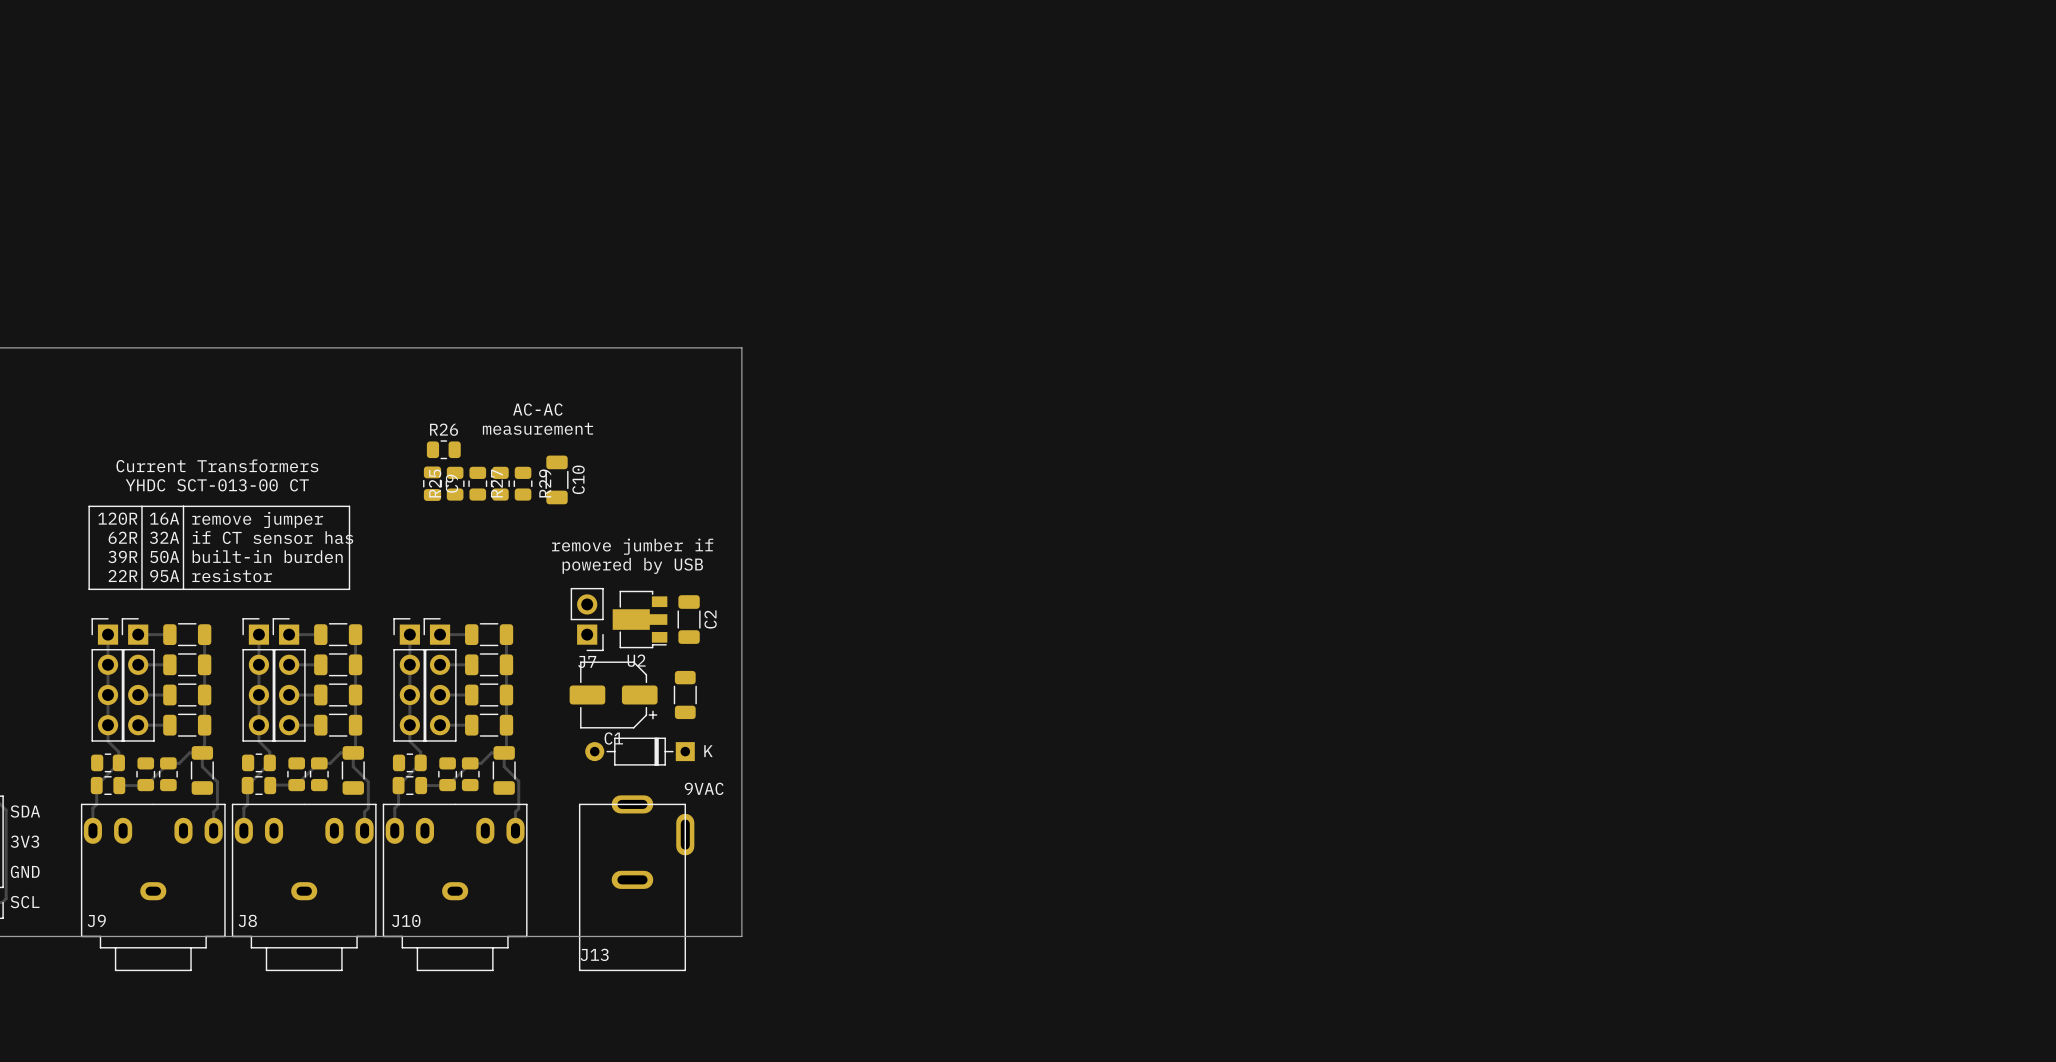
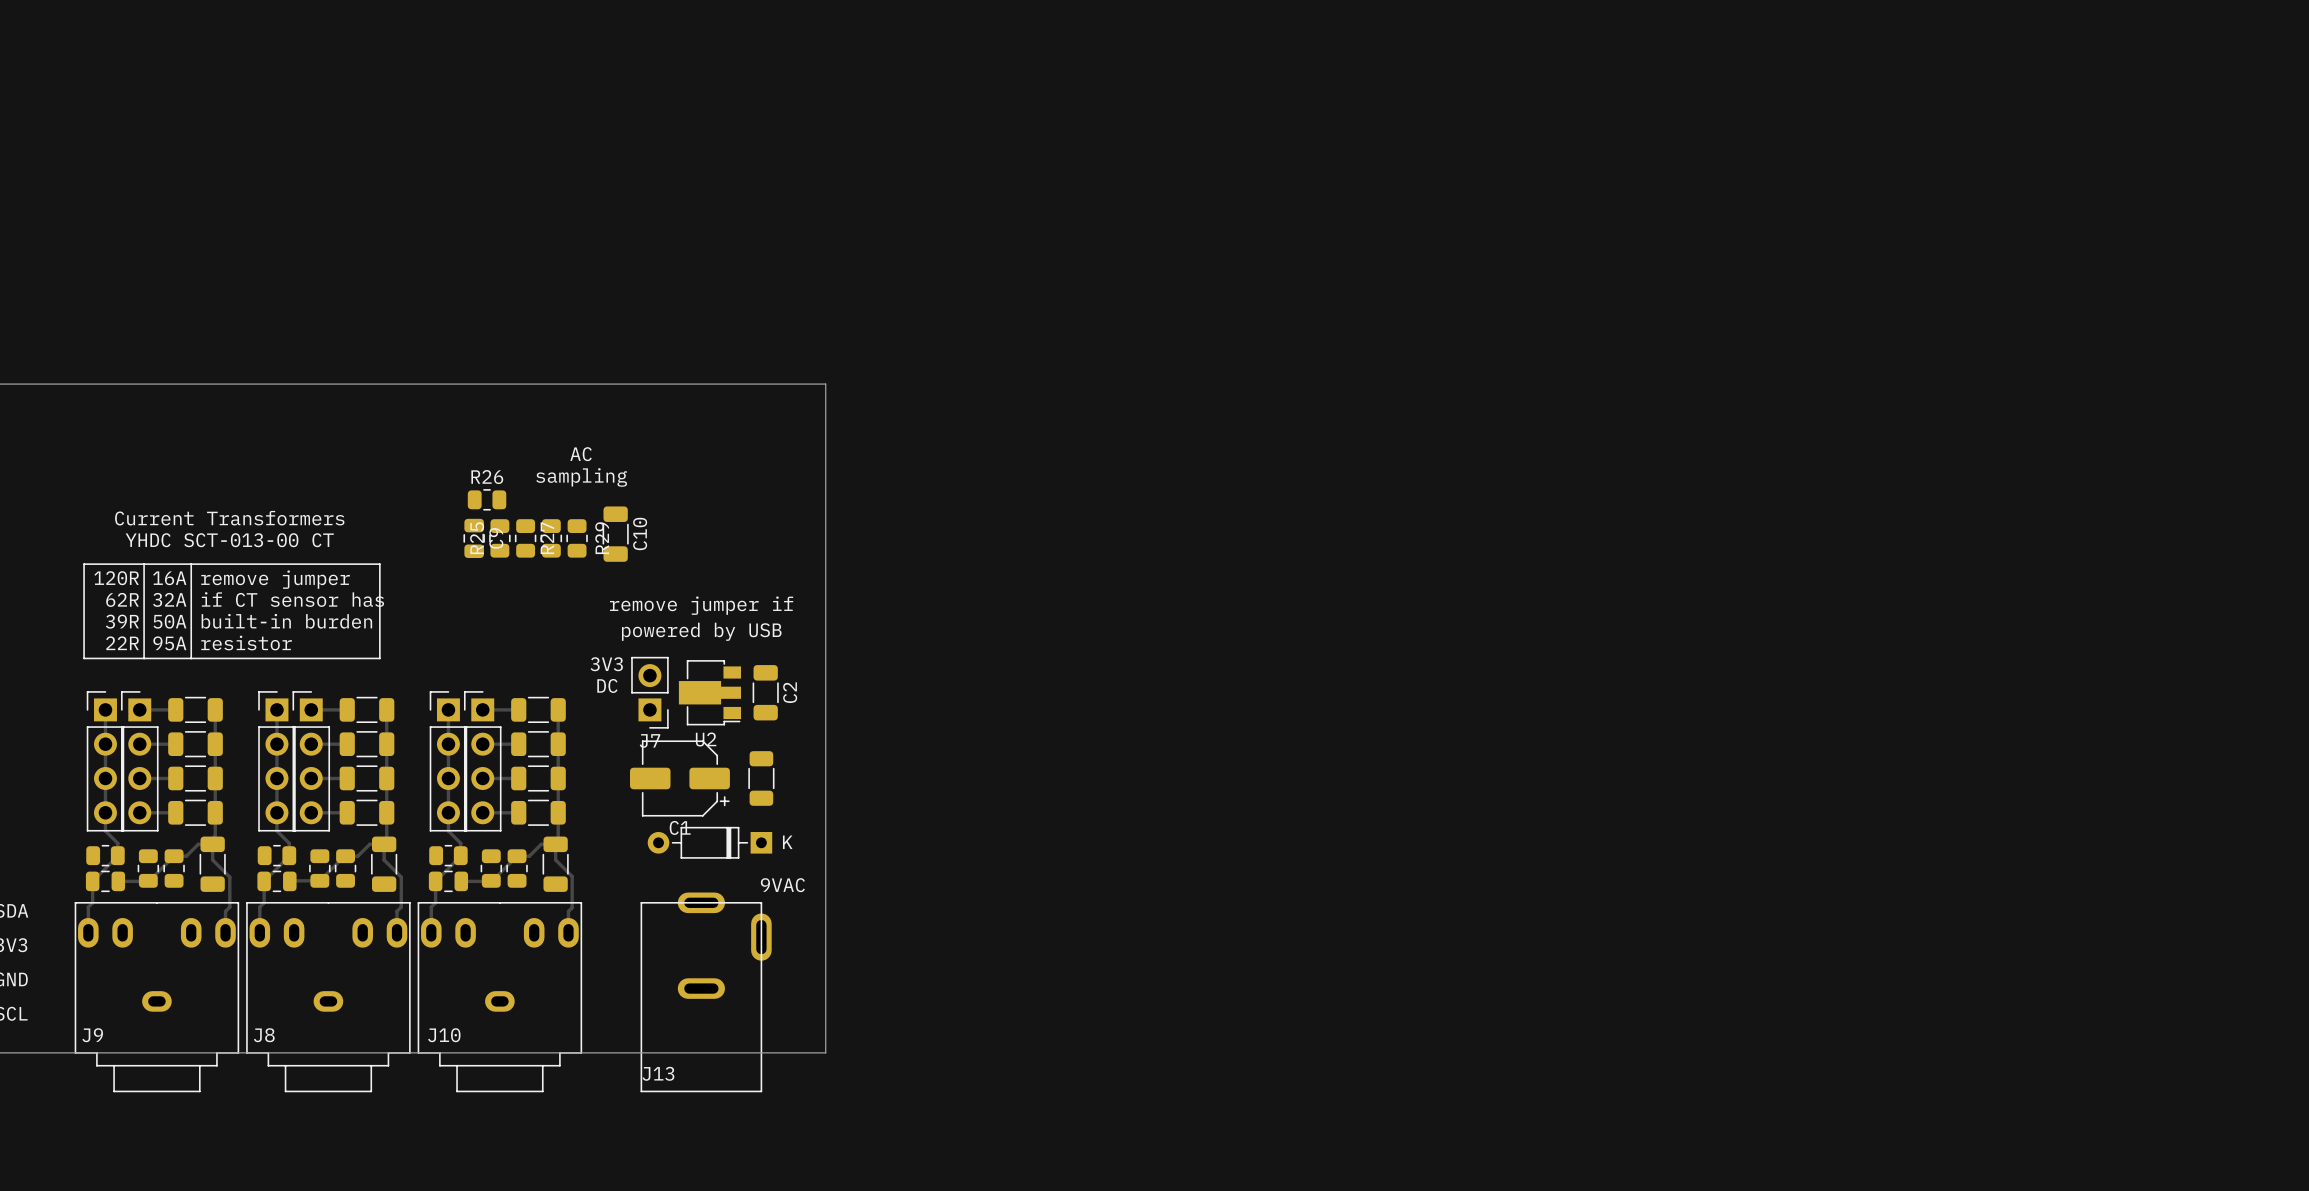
text: none -> AC (581, 454)
text: AC-AC (537, 409) -> none
text: measurement (537, 428) -> none
text: none -> sampling (581, 477)
text: remove jumber if (632, 546) -> remove jumper if (701, 605)
text: none -> 3V3 (606, 664)
text: none -> DC (607, 685)

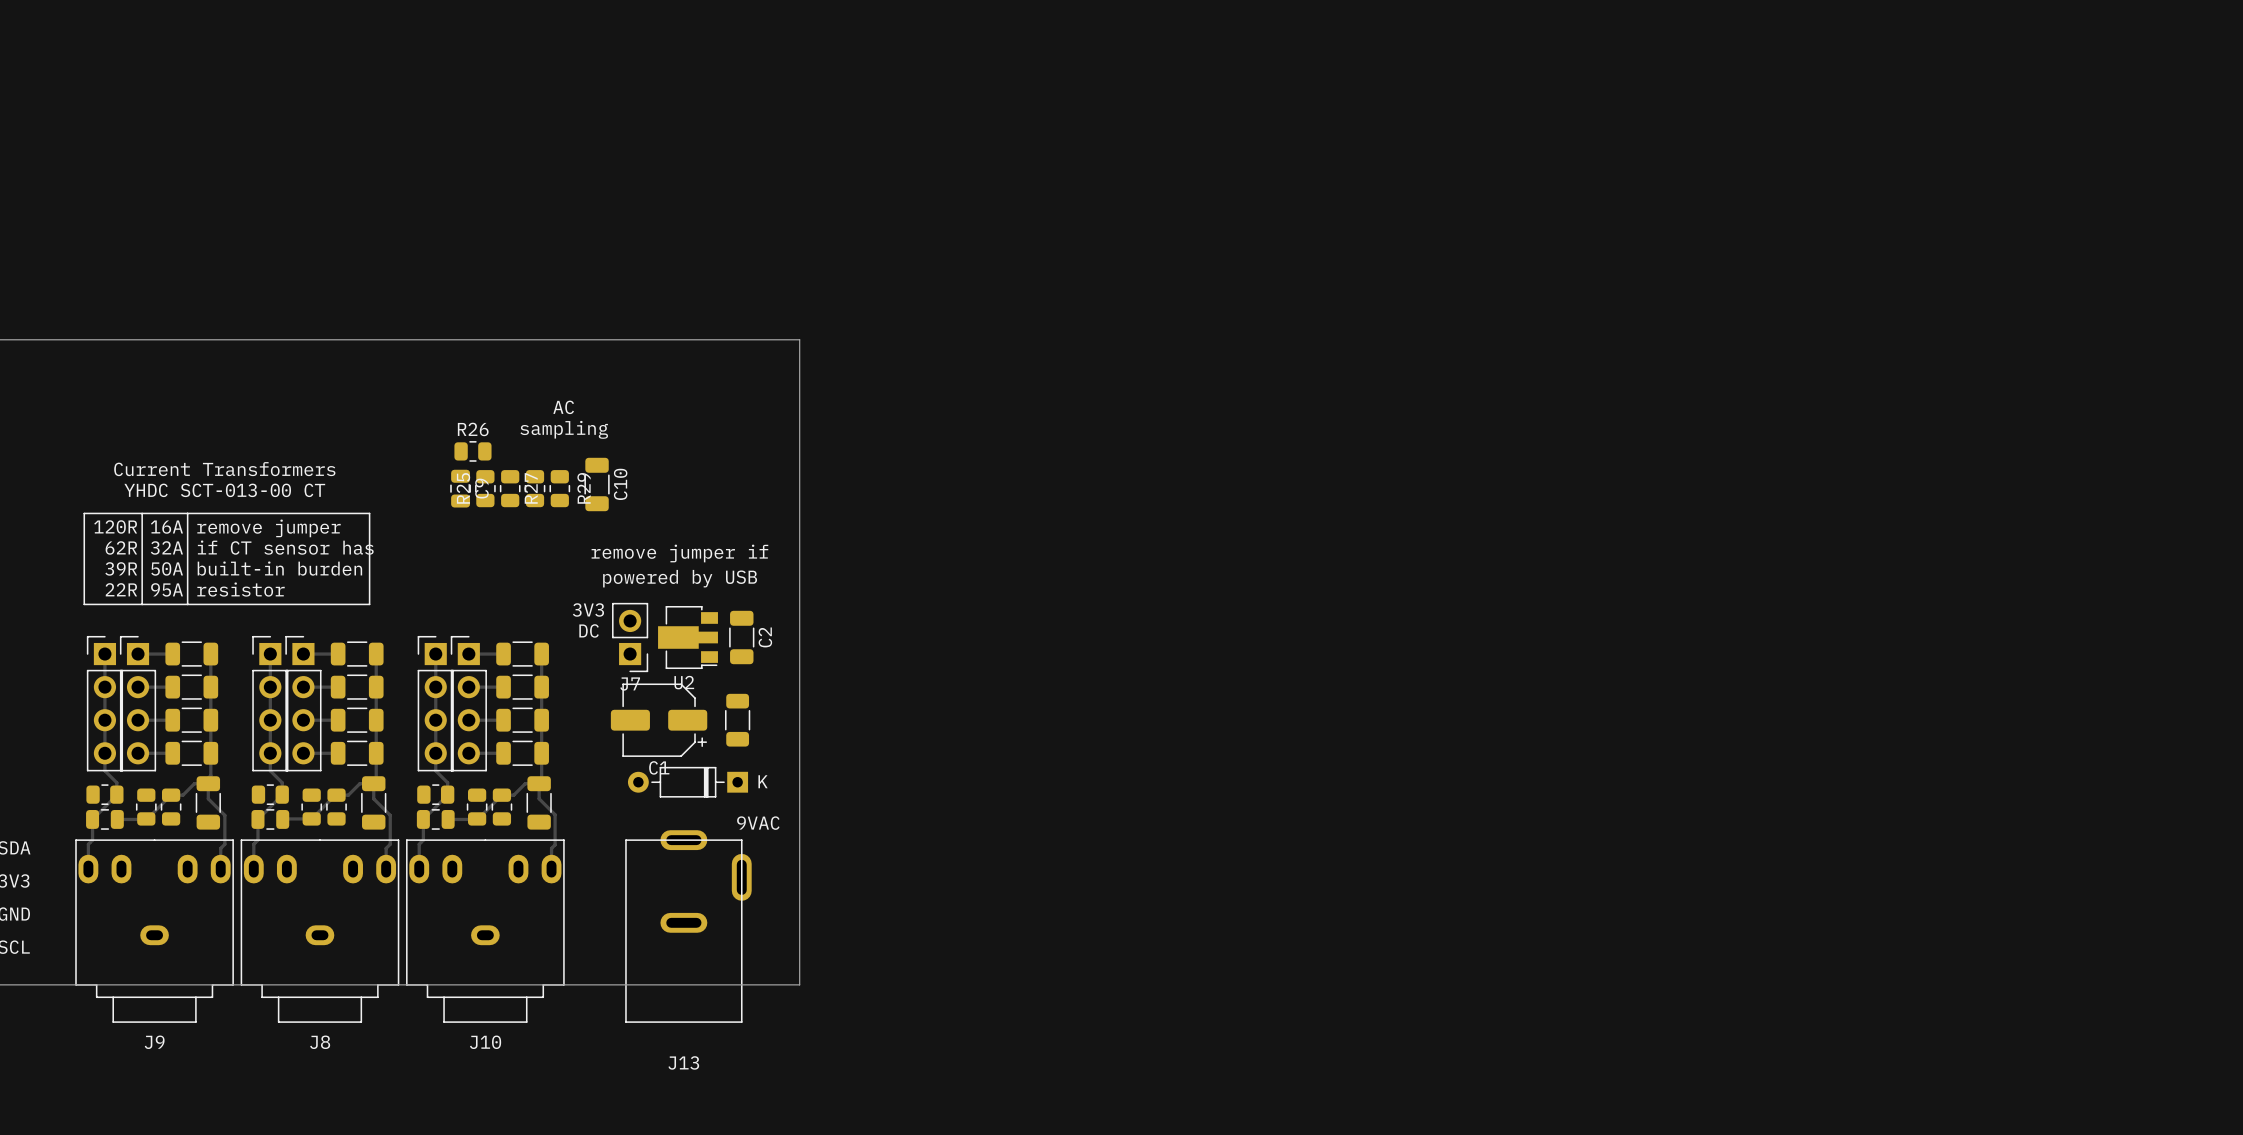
J13 footprint: [640, 892, 772, 1093] -> [625, 830, 752, 1023]
J9 name position: J9 (92, 1035) -> J9 (154, 1042)
J8 name position: J8 (264, 1035) -> J8 (320, 1042)
J10 name position: J10 (444, 1035) -> J10 (485, 1042)
J13 name position: J13 (658, 1073) -> J13 (683, 1062)

